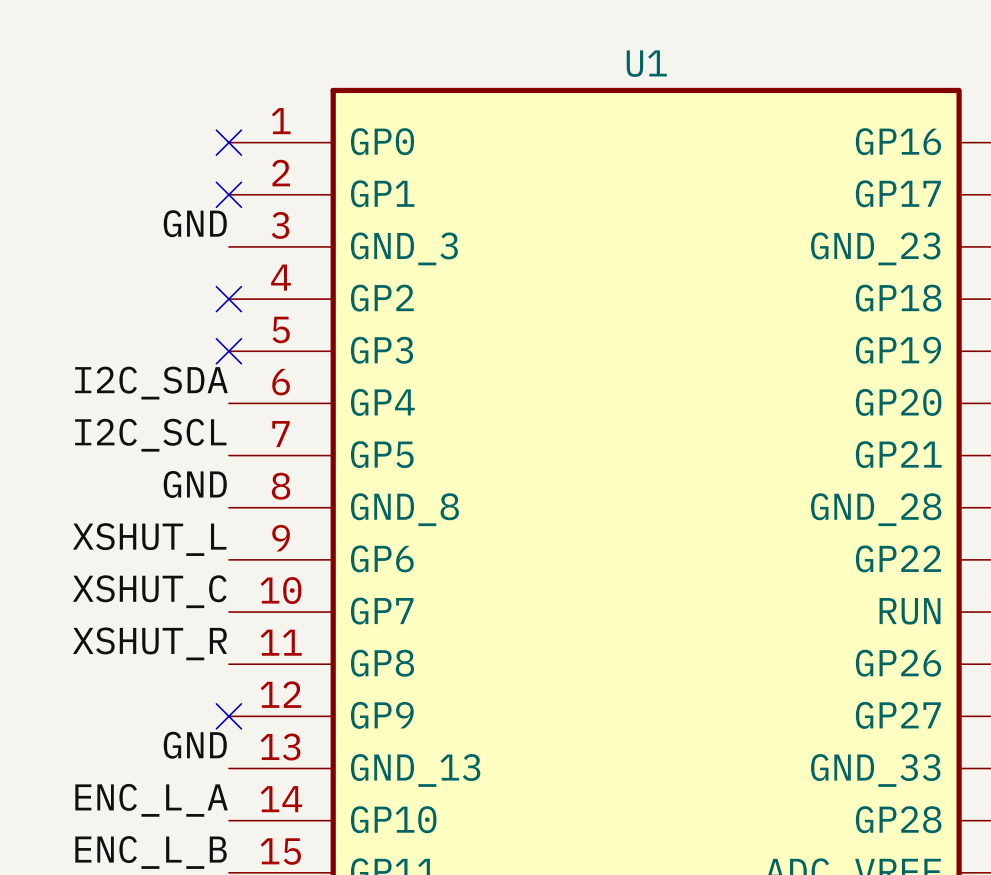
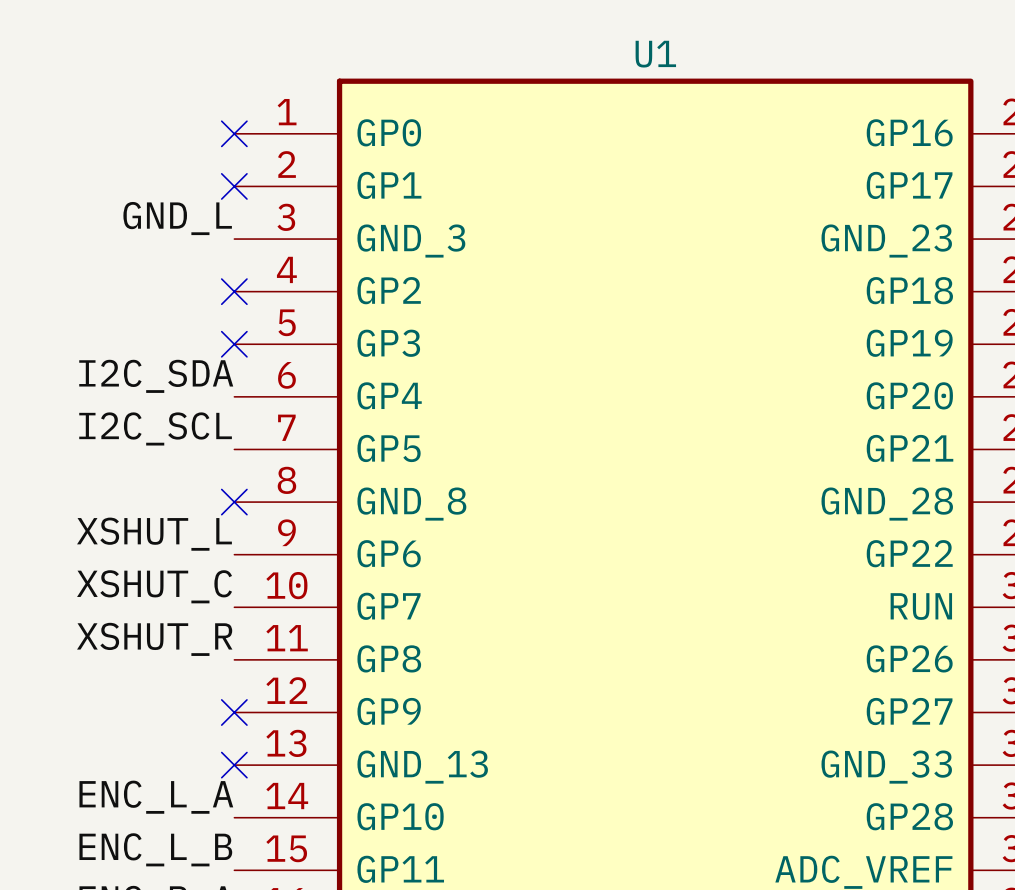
label: GND (195, 223) -> GND_L (177, 218)
label: GND (195, 484) -> none
no-connect mark: none -> (234, 502)
label: GND (195, 745) -> none
no-connect mark: none -> (234, 765)

